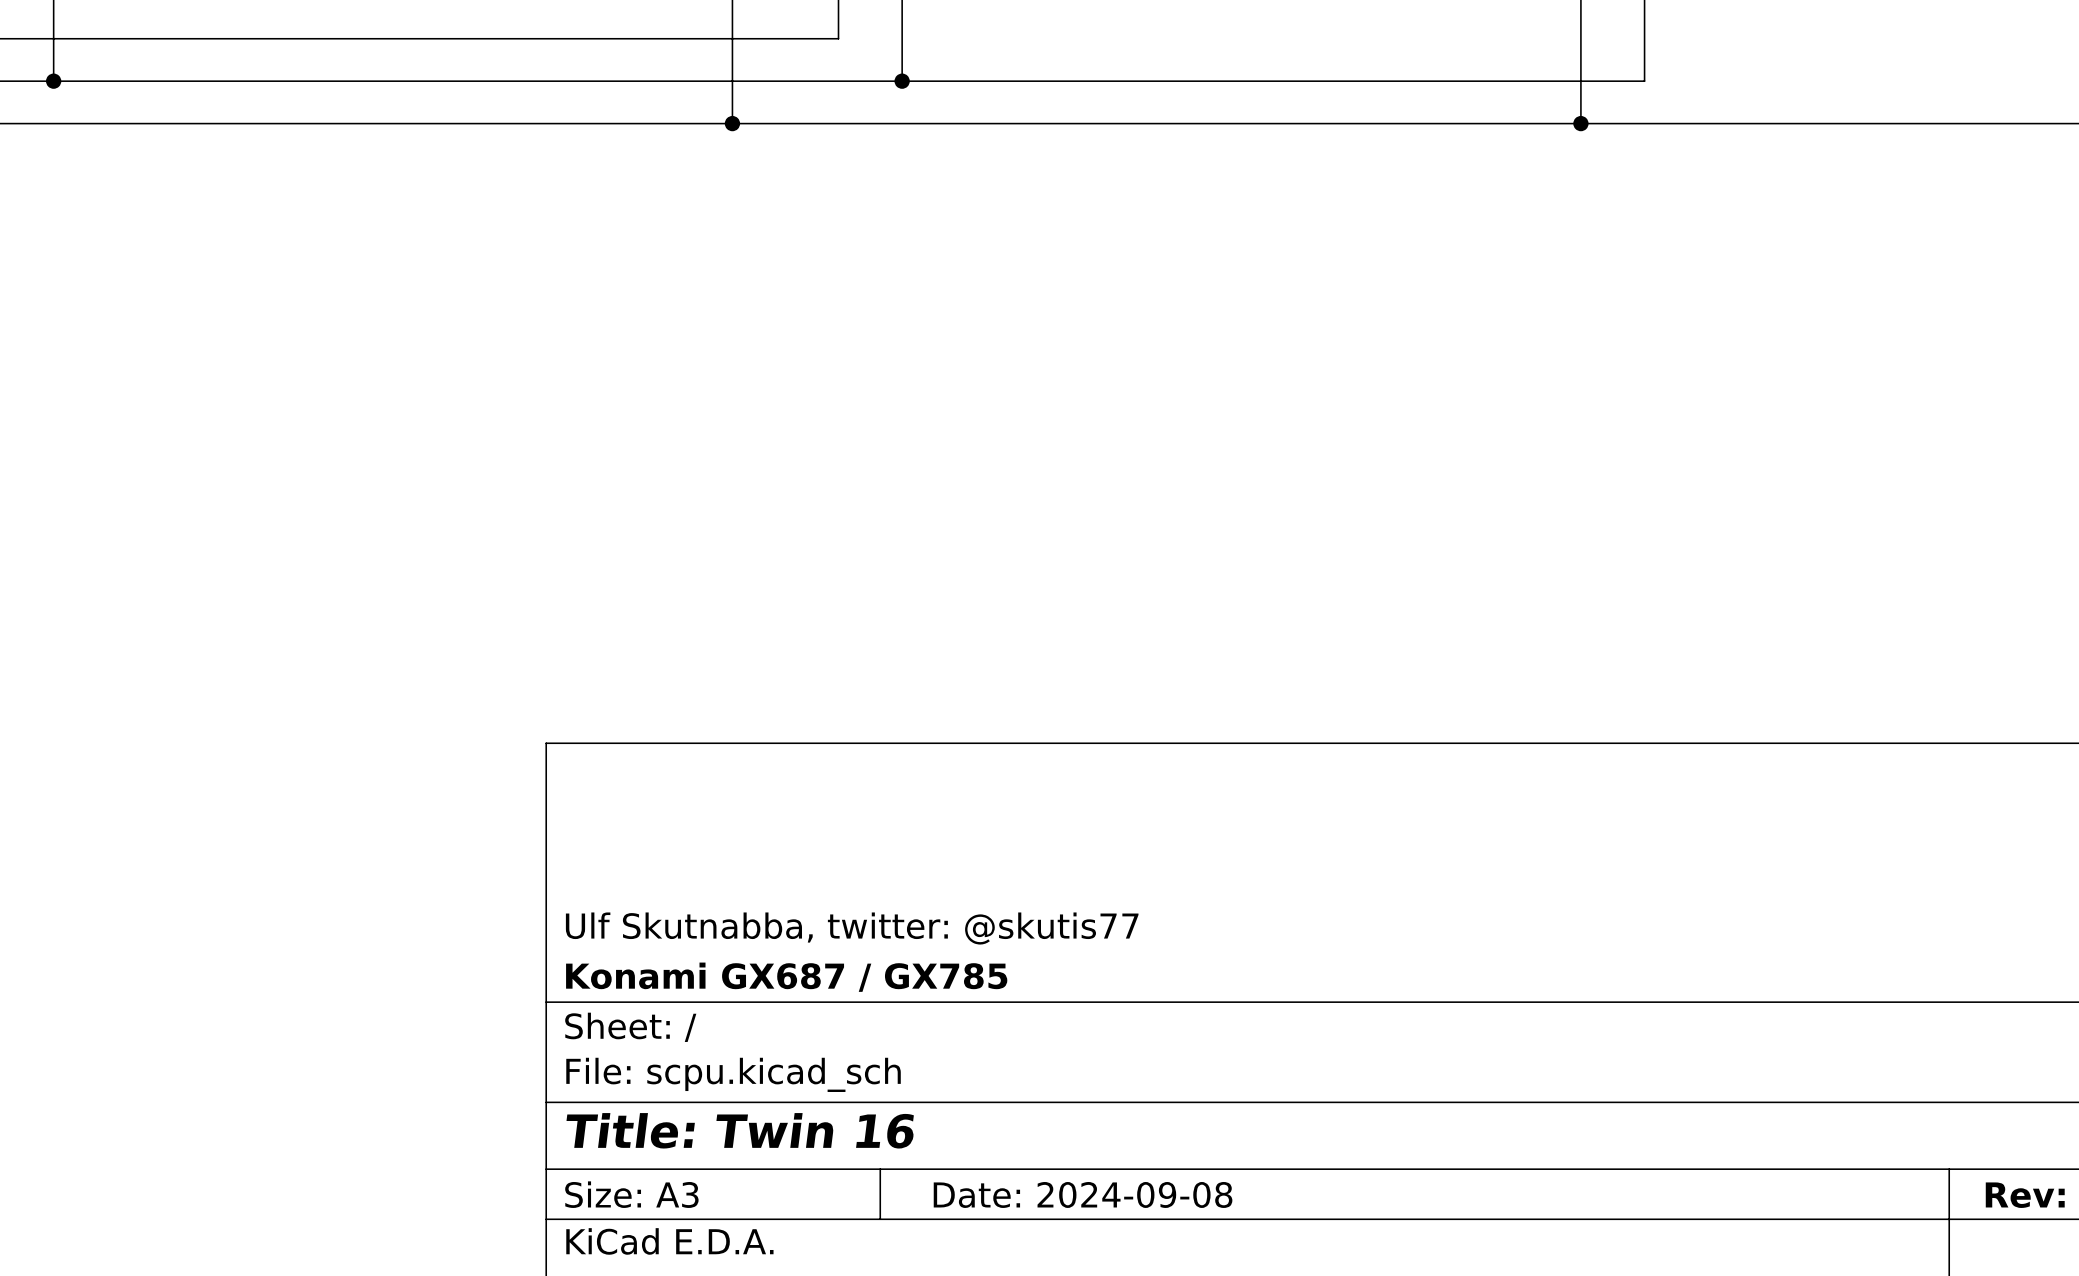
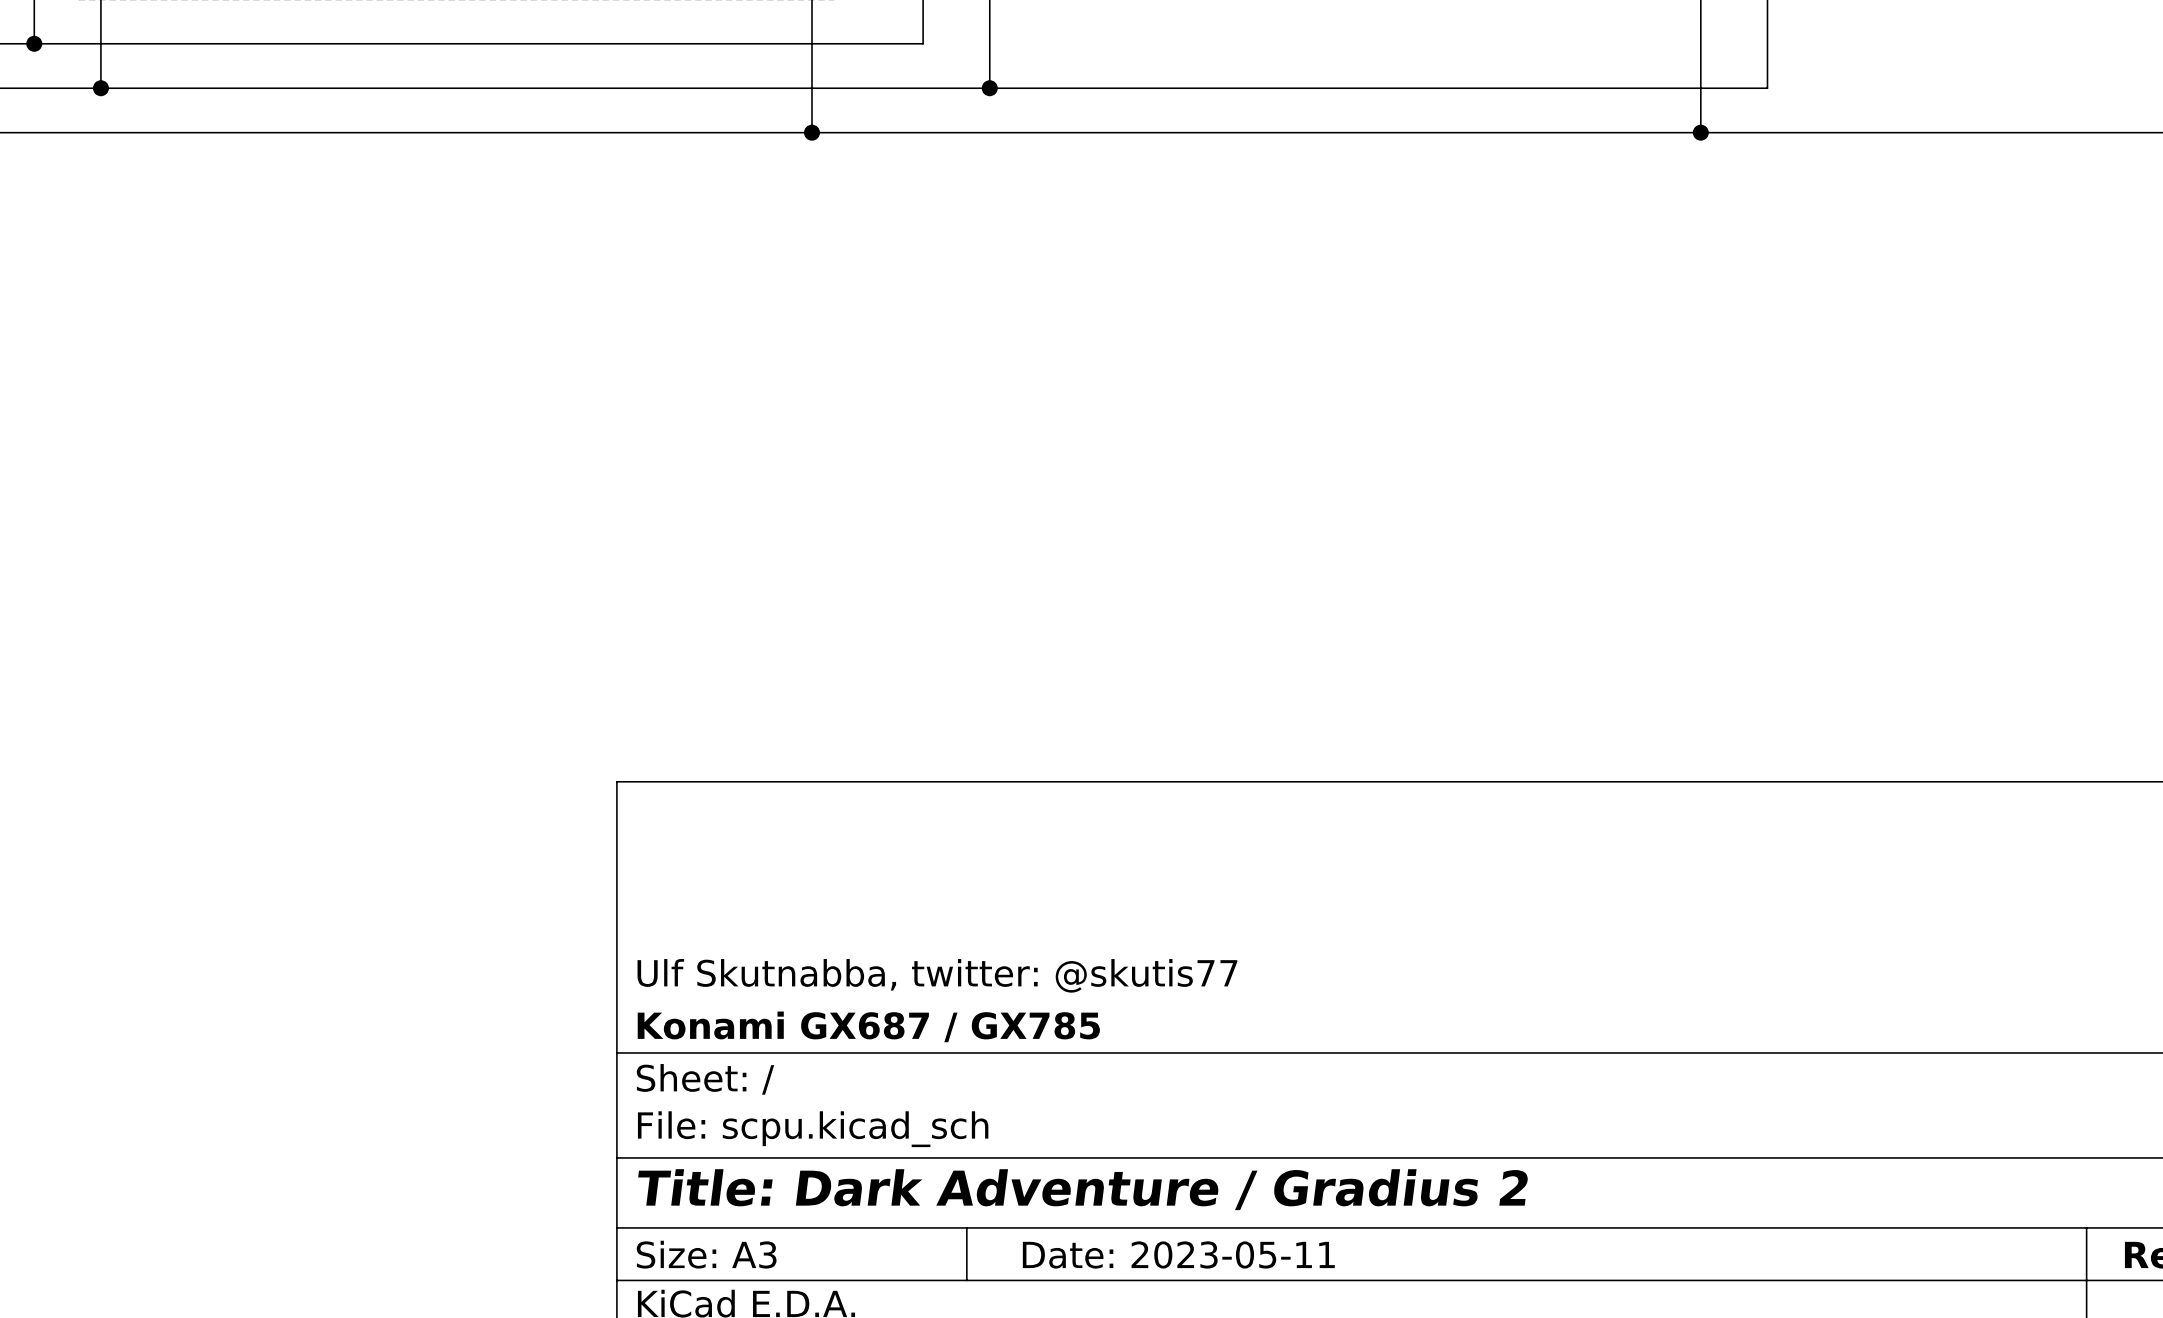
title block: Title: Twin 16 (740, 1130) -> Title: Dark Adventure / Gradius 2 (1083, 1189)
title block: Date: 2024-09-08 (1083, 1194) -> Date: 2023-05-11 (1178, 1254)

